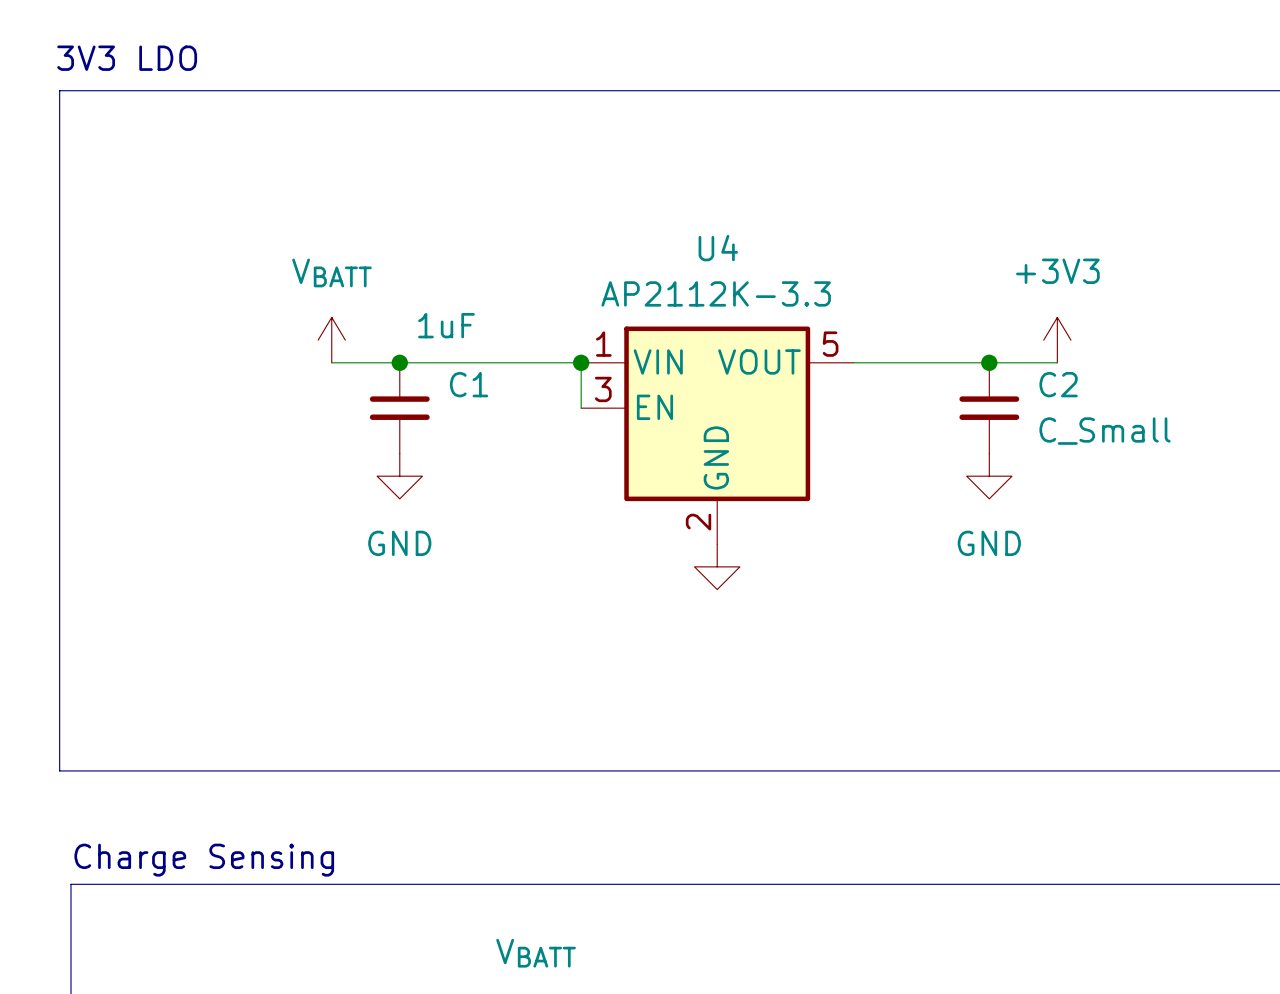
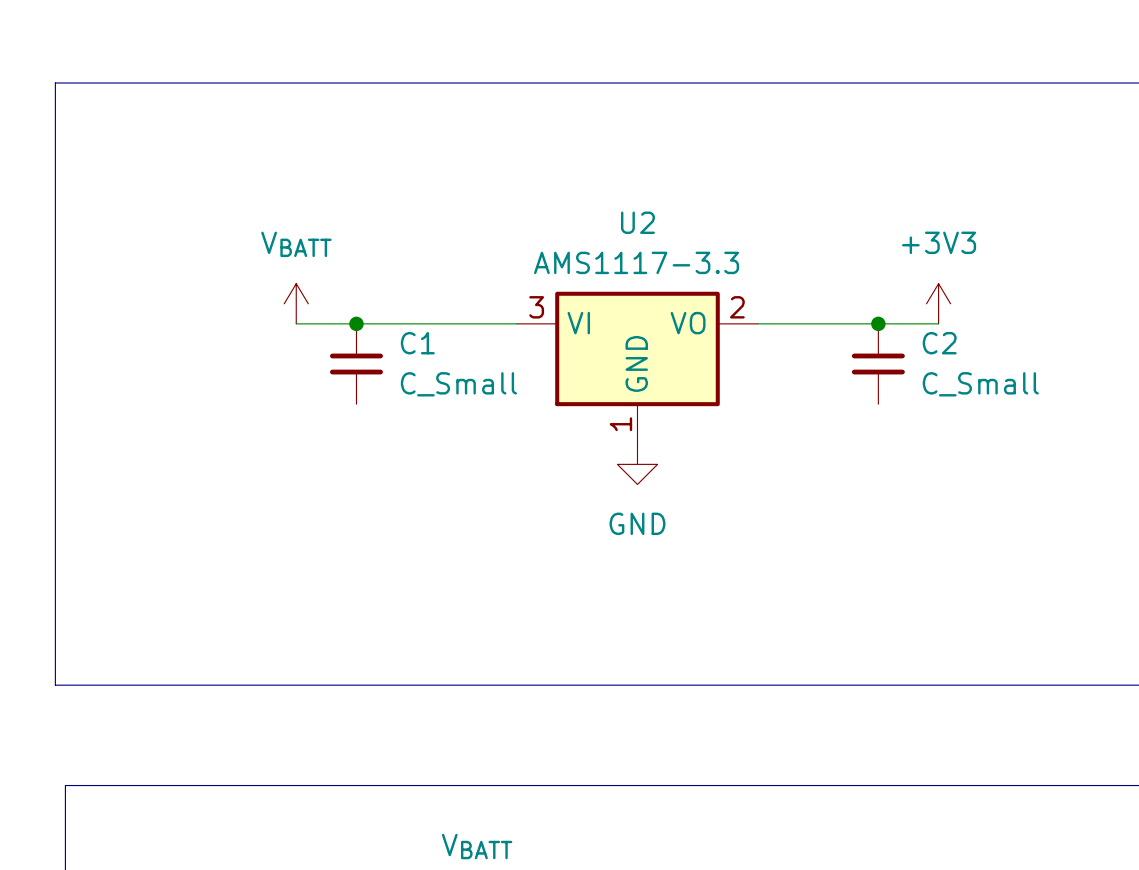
text: 3V3 LDO (127, 58) -> none
C1 value: 1uF (446, 325) -> C_Small (458, 384)
wire: (581, 362) (581, 408) -> none
junction: (581, 362) -> none
U2: none -> AMS1117-3.3 (637, 368)
U4: AP2112K-3.3 (717, 435) -> none
power symbol: GND (399, 476) -> none
power symbol: GND (989, 476) -> none
power symbol: none -> GND (637, 464)
power symbol: (717, 566) -> none
text: Charge Sensing (204, 860) -> none

